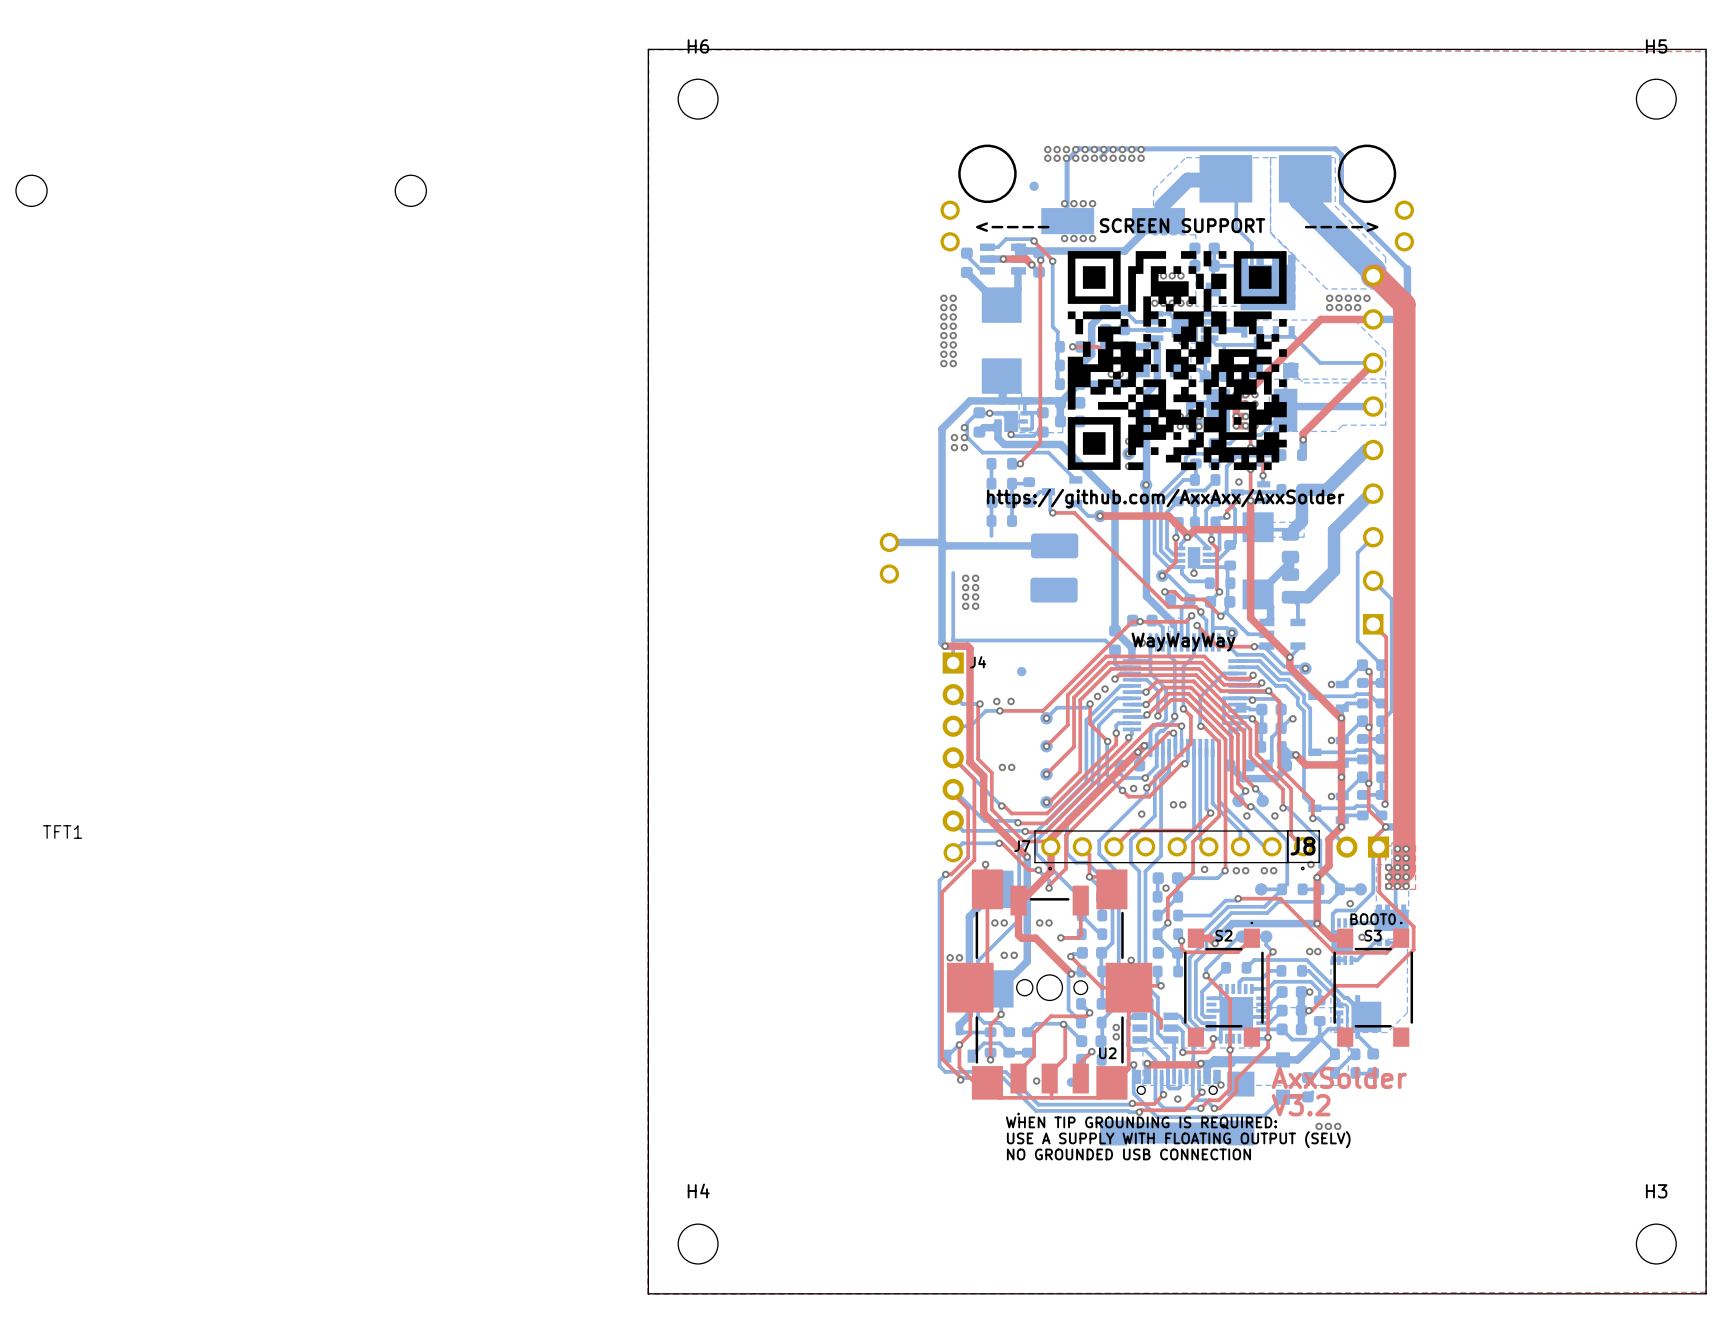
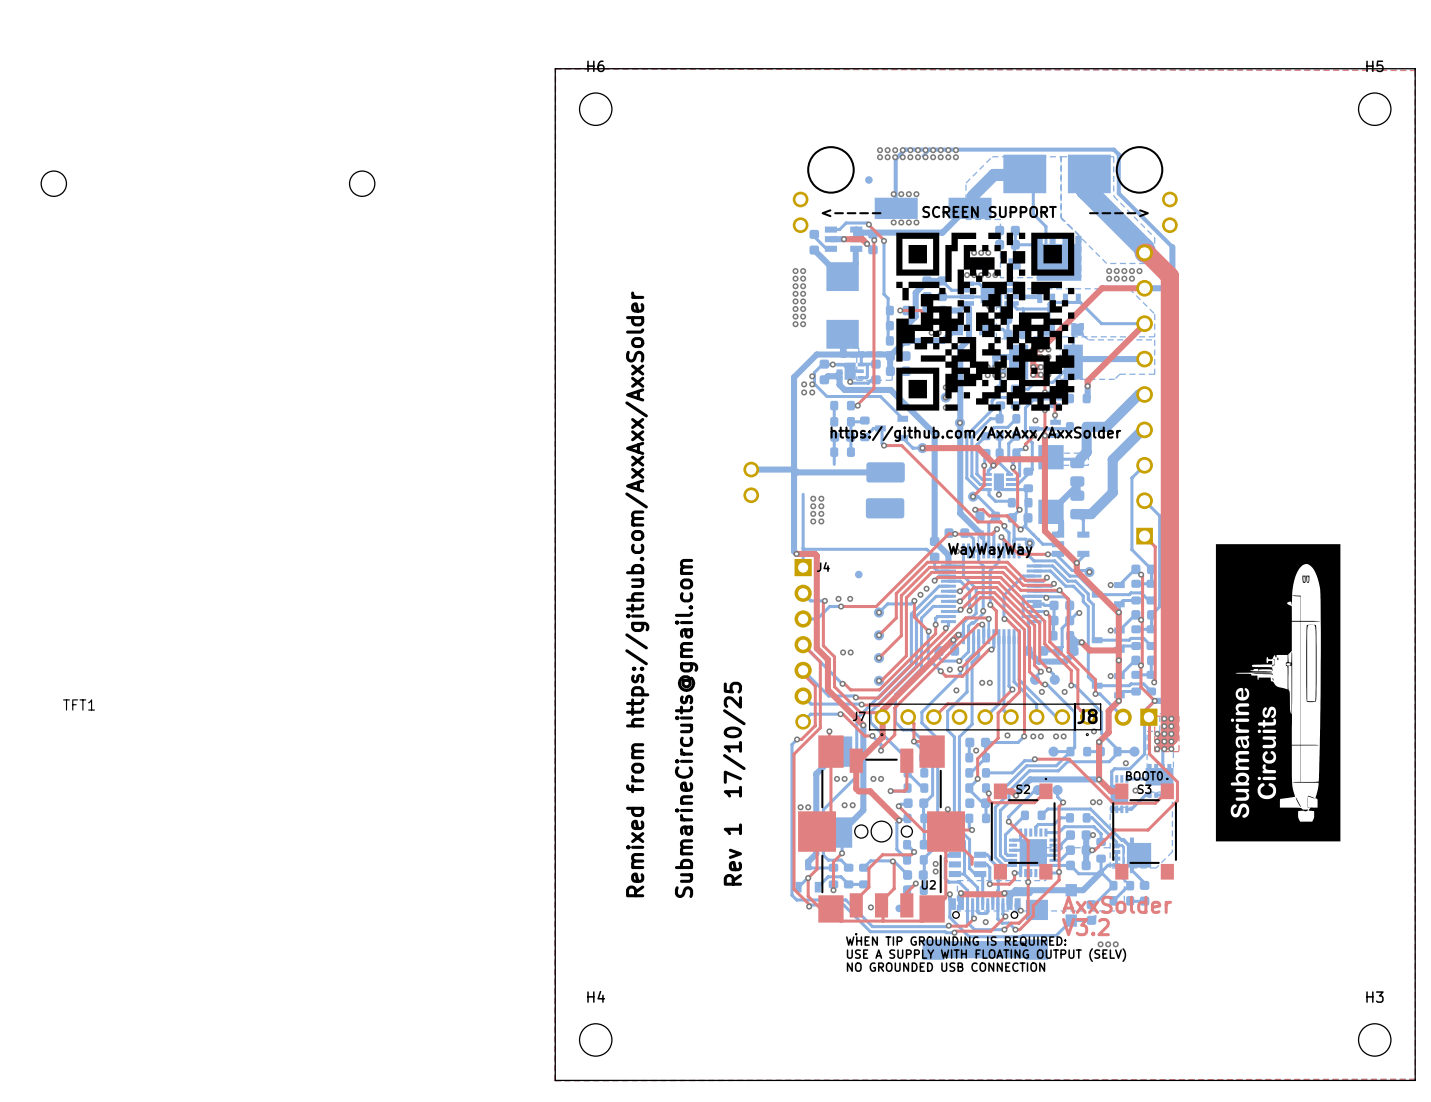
drawing: none -> [1215, 544, 1341, 842]
text: none -> Remixed from https://github.com/AxxAxx/AxxSolder (637, 594)
text: none -> SubmarineCircuits@gmail.com (686, 728)
text: none -> Rev 1 17/10/25 (734, 783)

